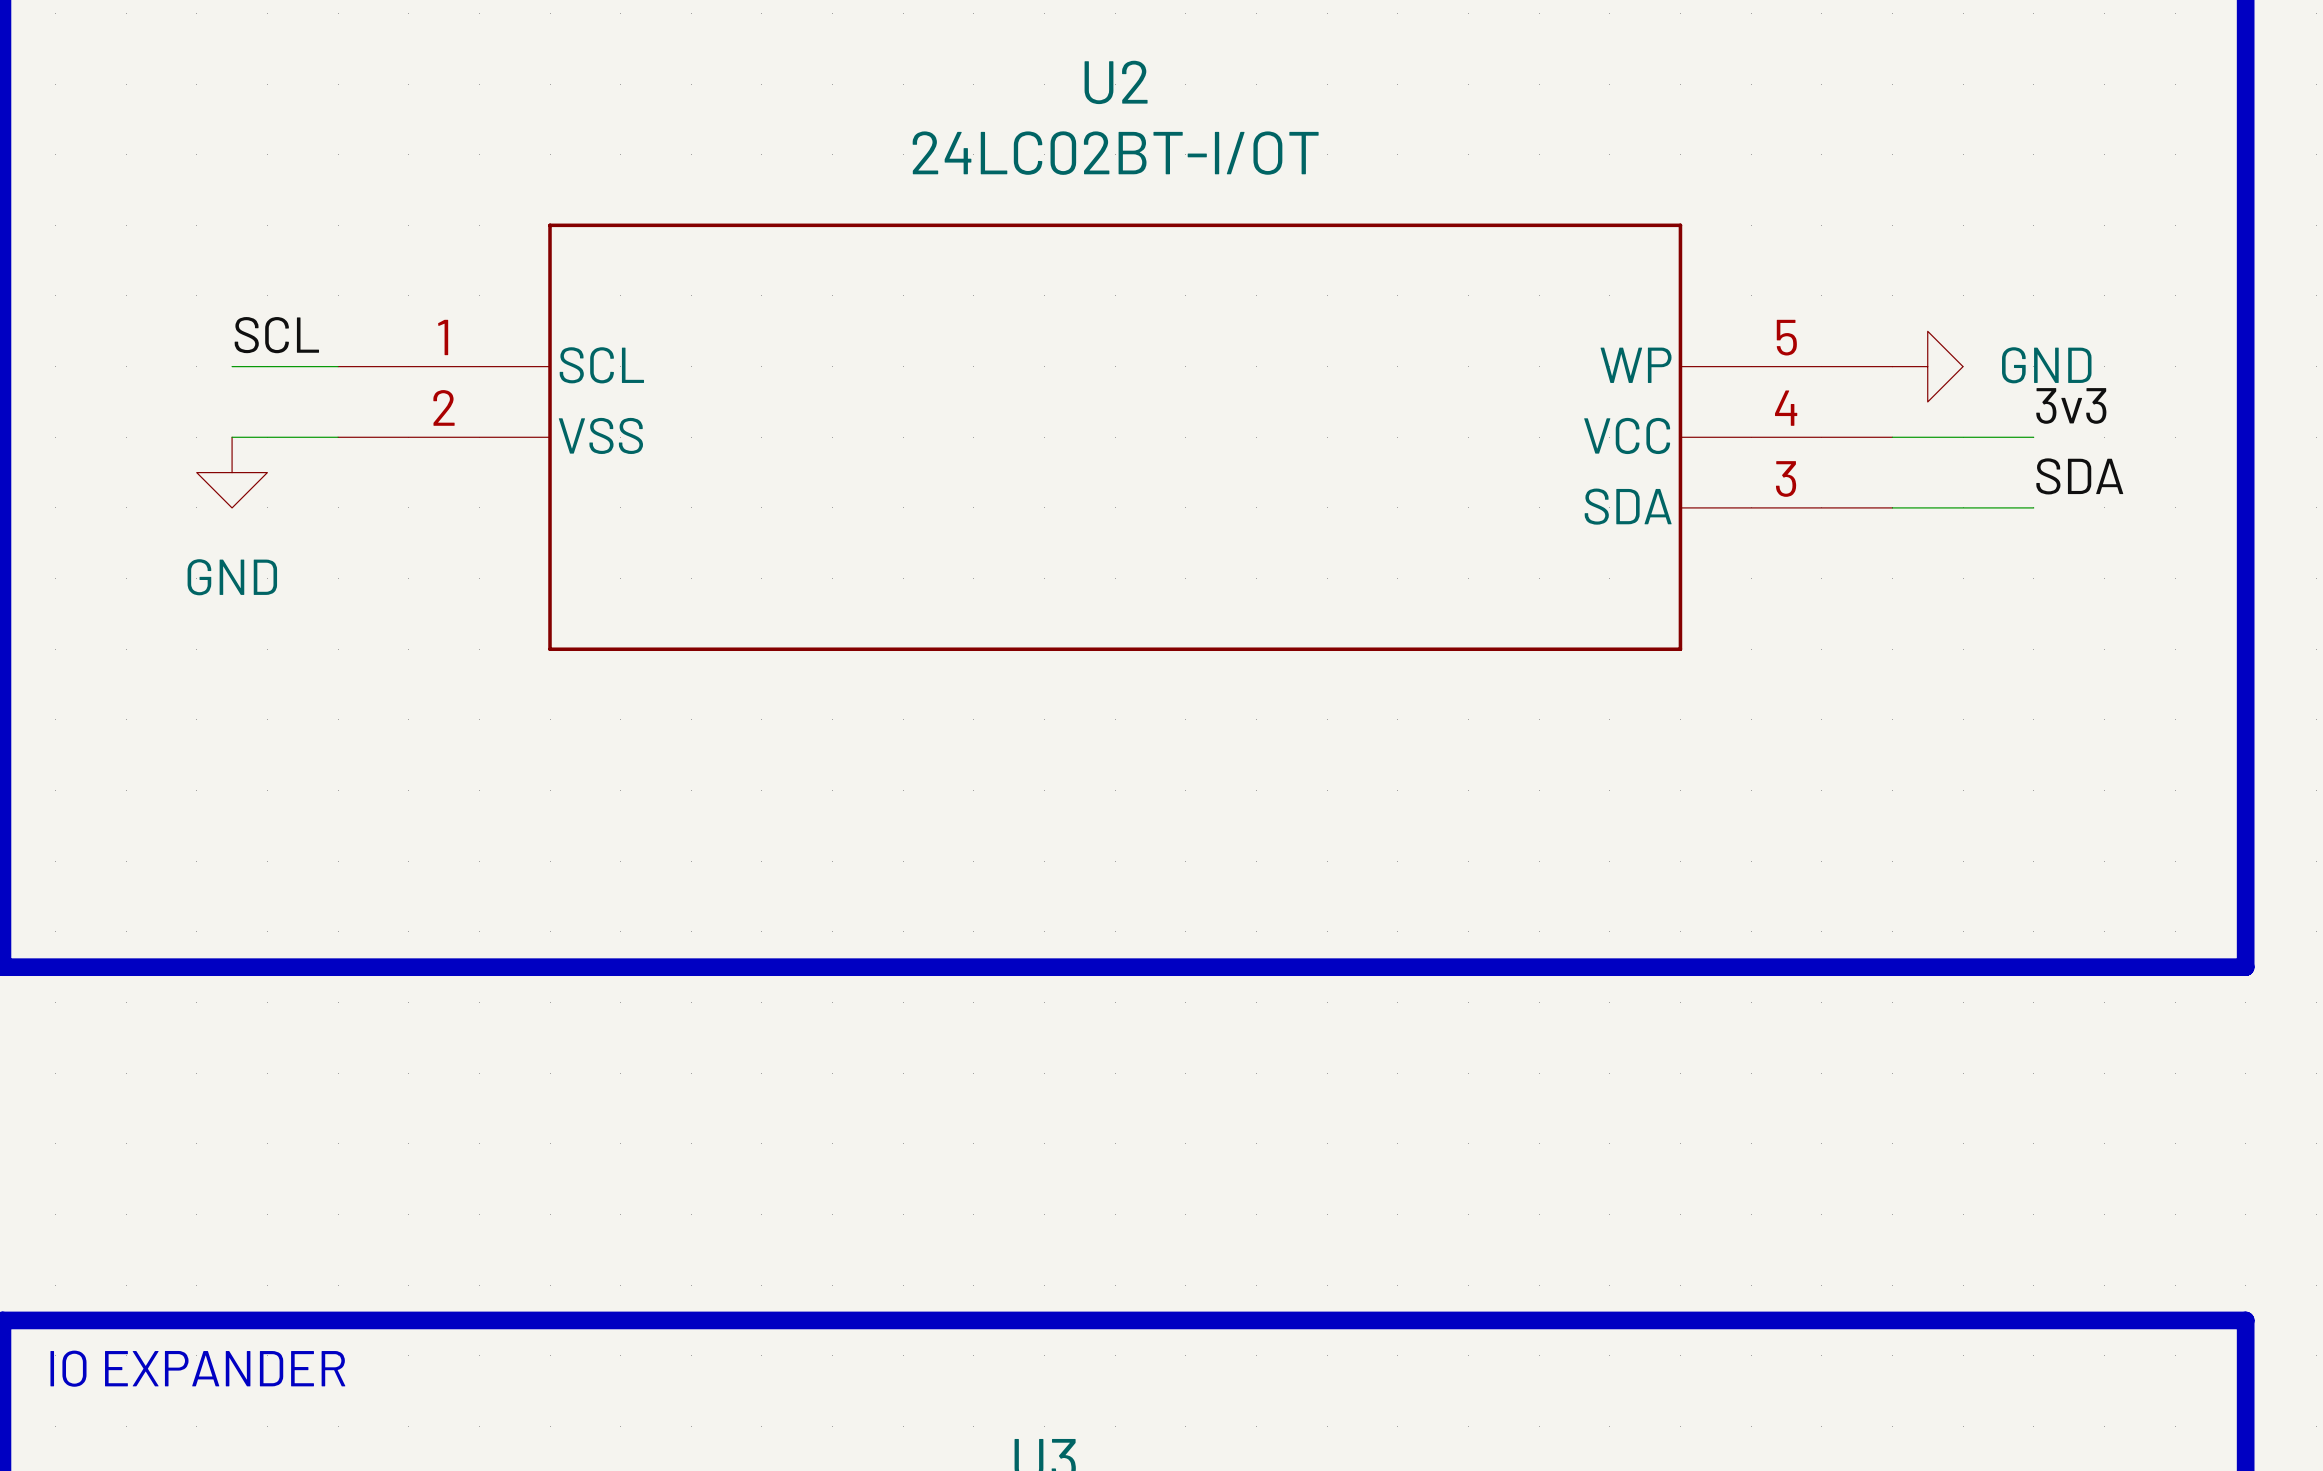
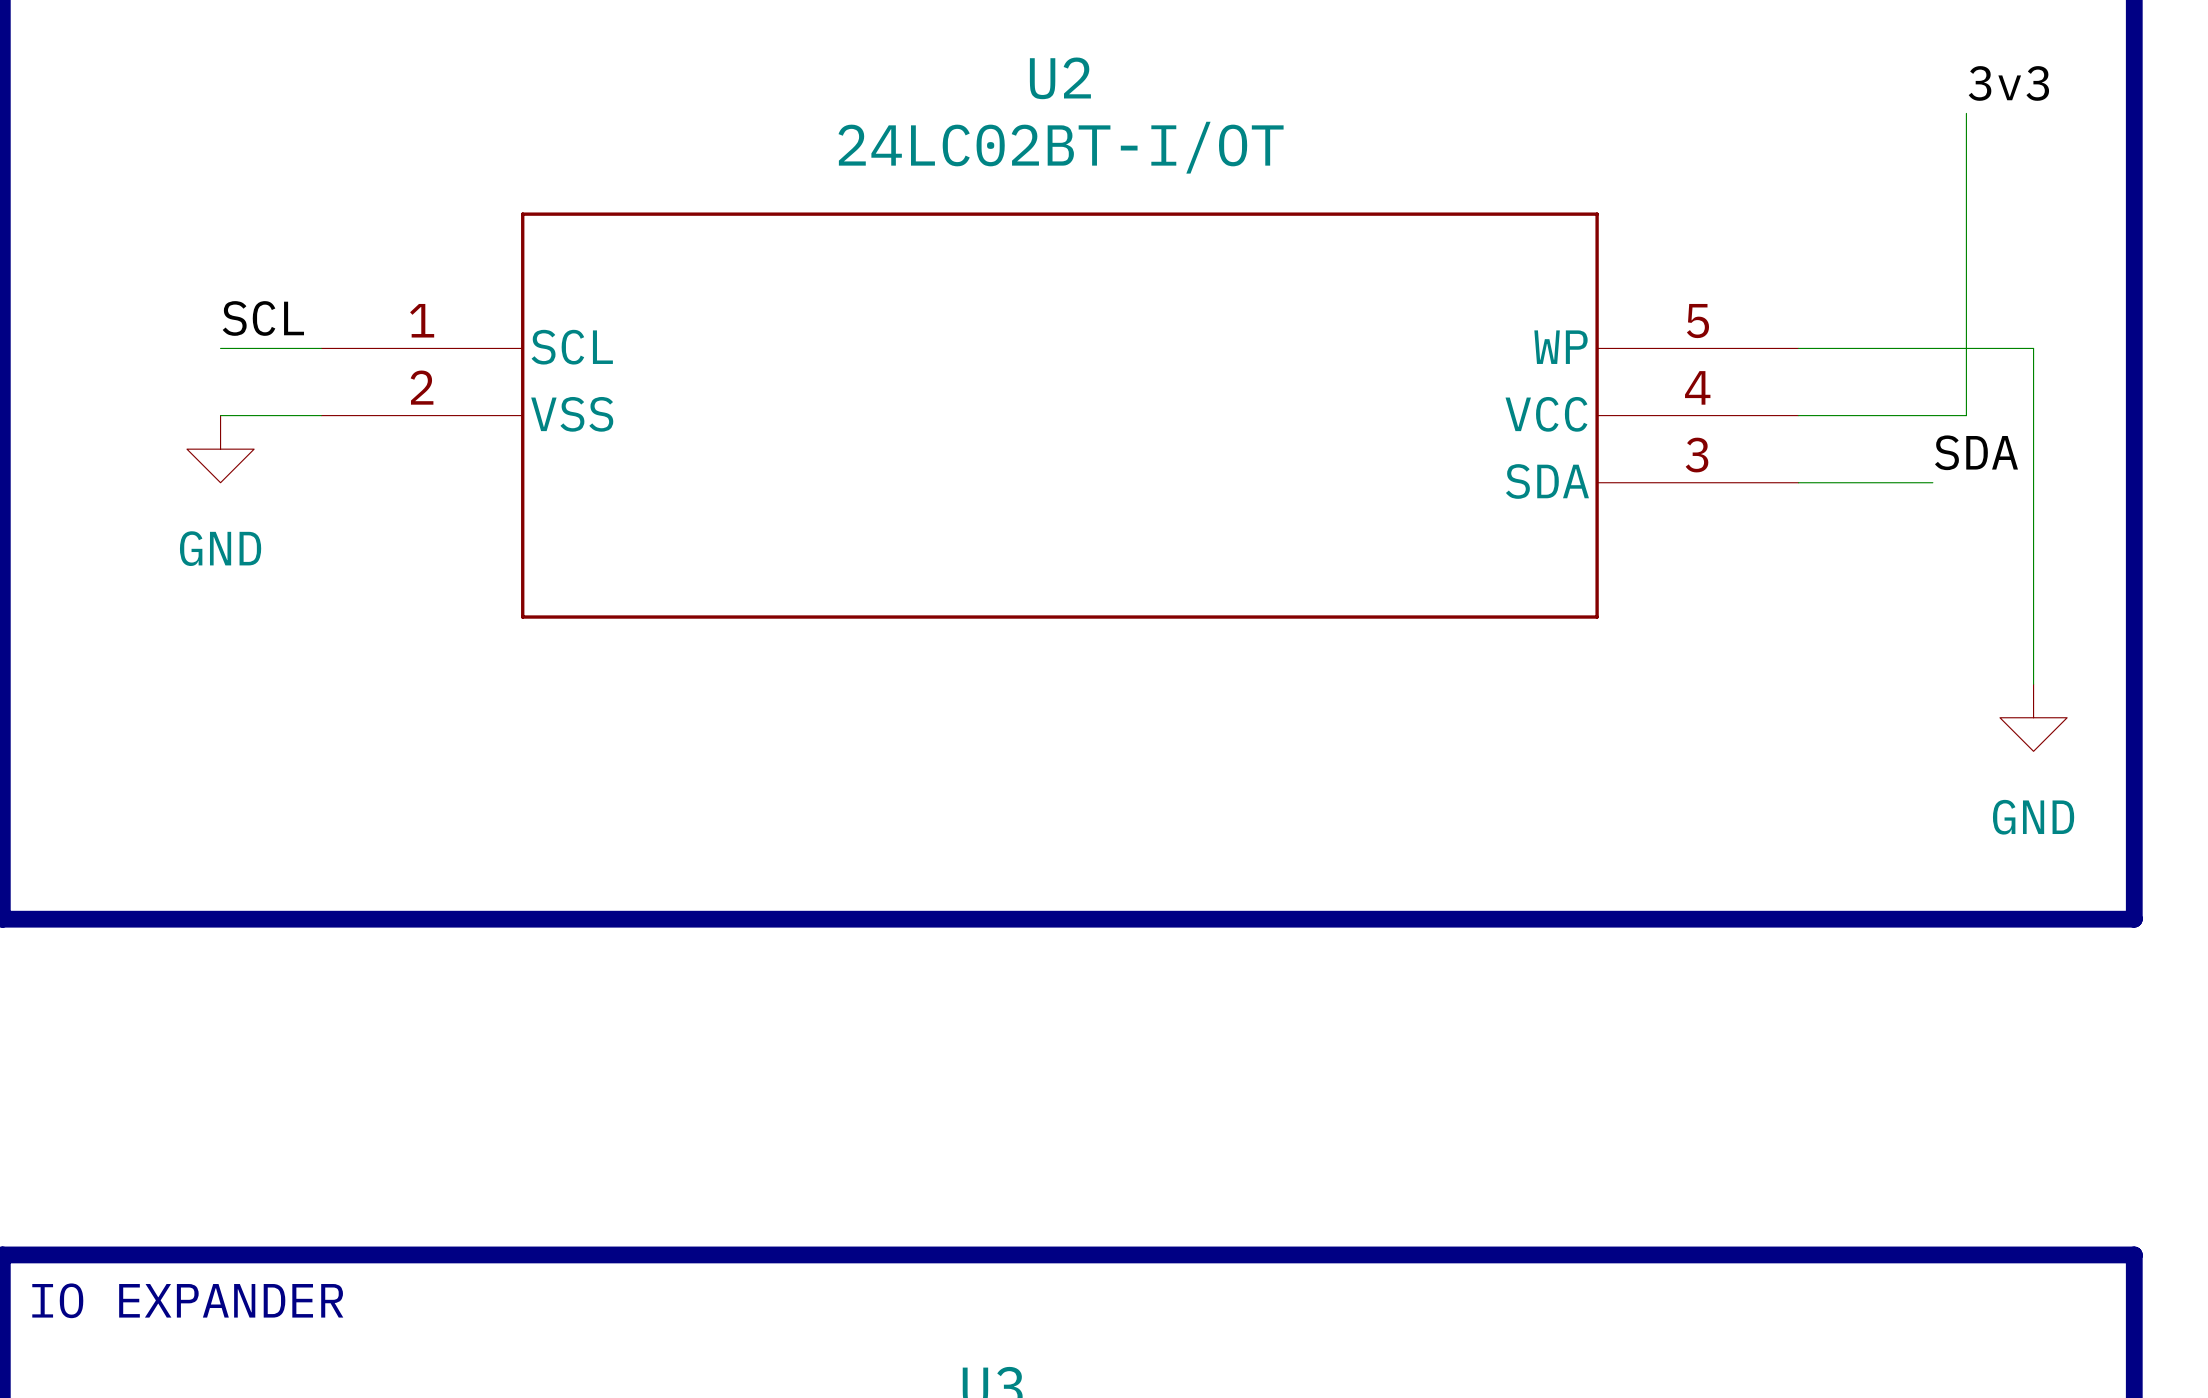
wire: none -> (1966, 113) (1966, 415) (1932, 415)
wire: none -> (1798, 348) (2033, 348) (2033, 684)
power symbol rotation: 0° (1927, 366) -> 90° clockwise (2033, 717)
power symbol position: GND (1927, 366) -> GND (2033, 717)
label position: 3v3 (2071, 405) -> 3v3 (2008, 83)

